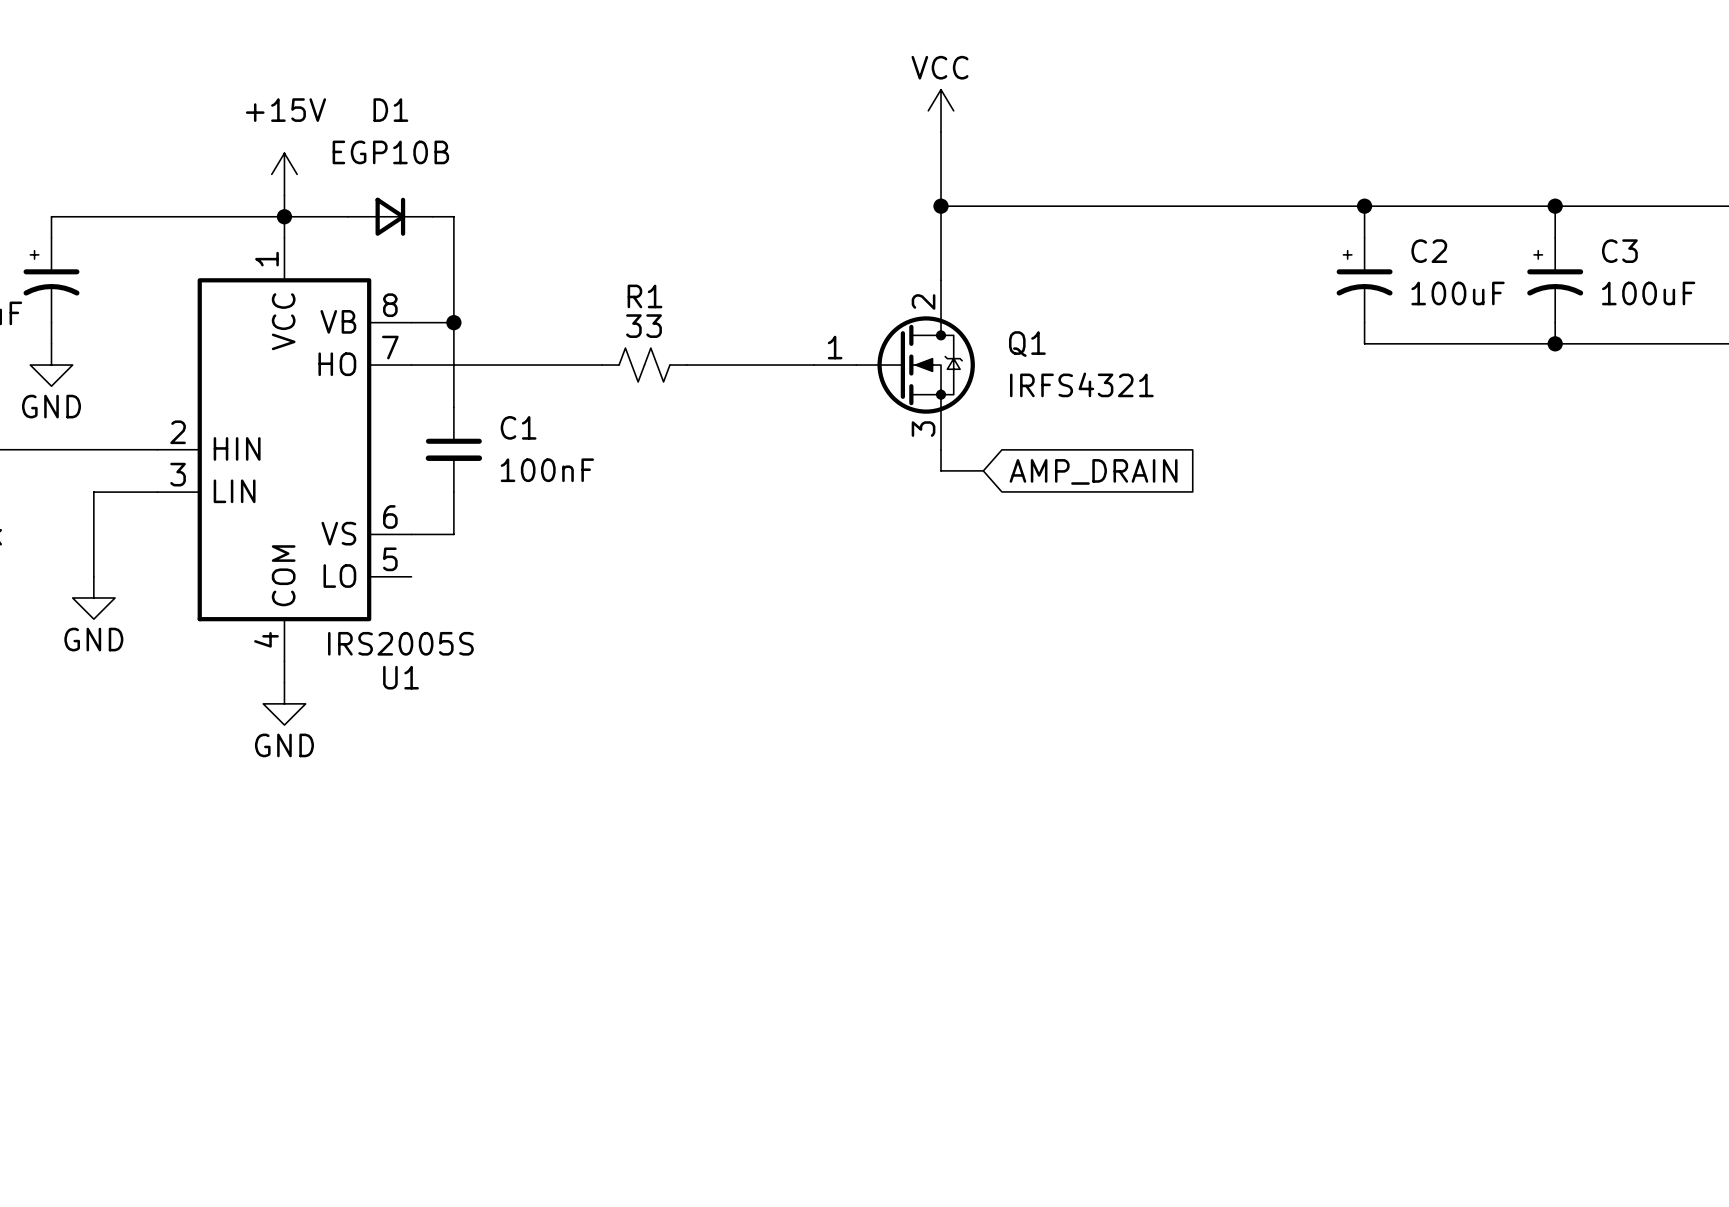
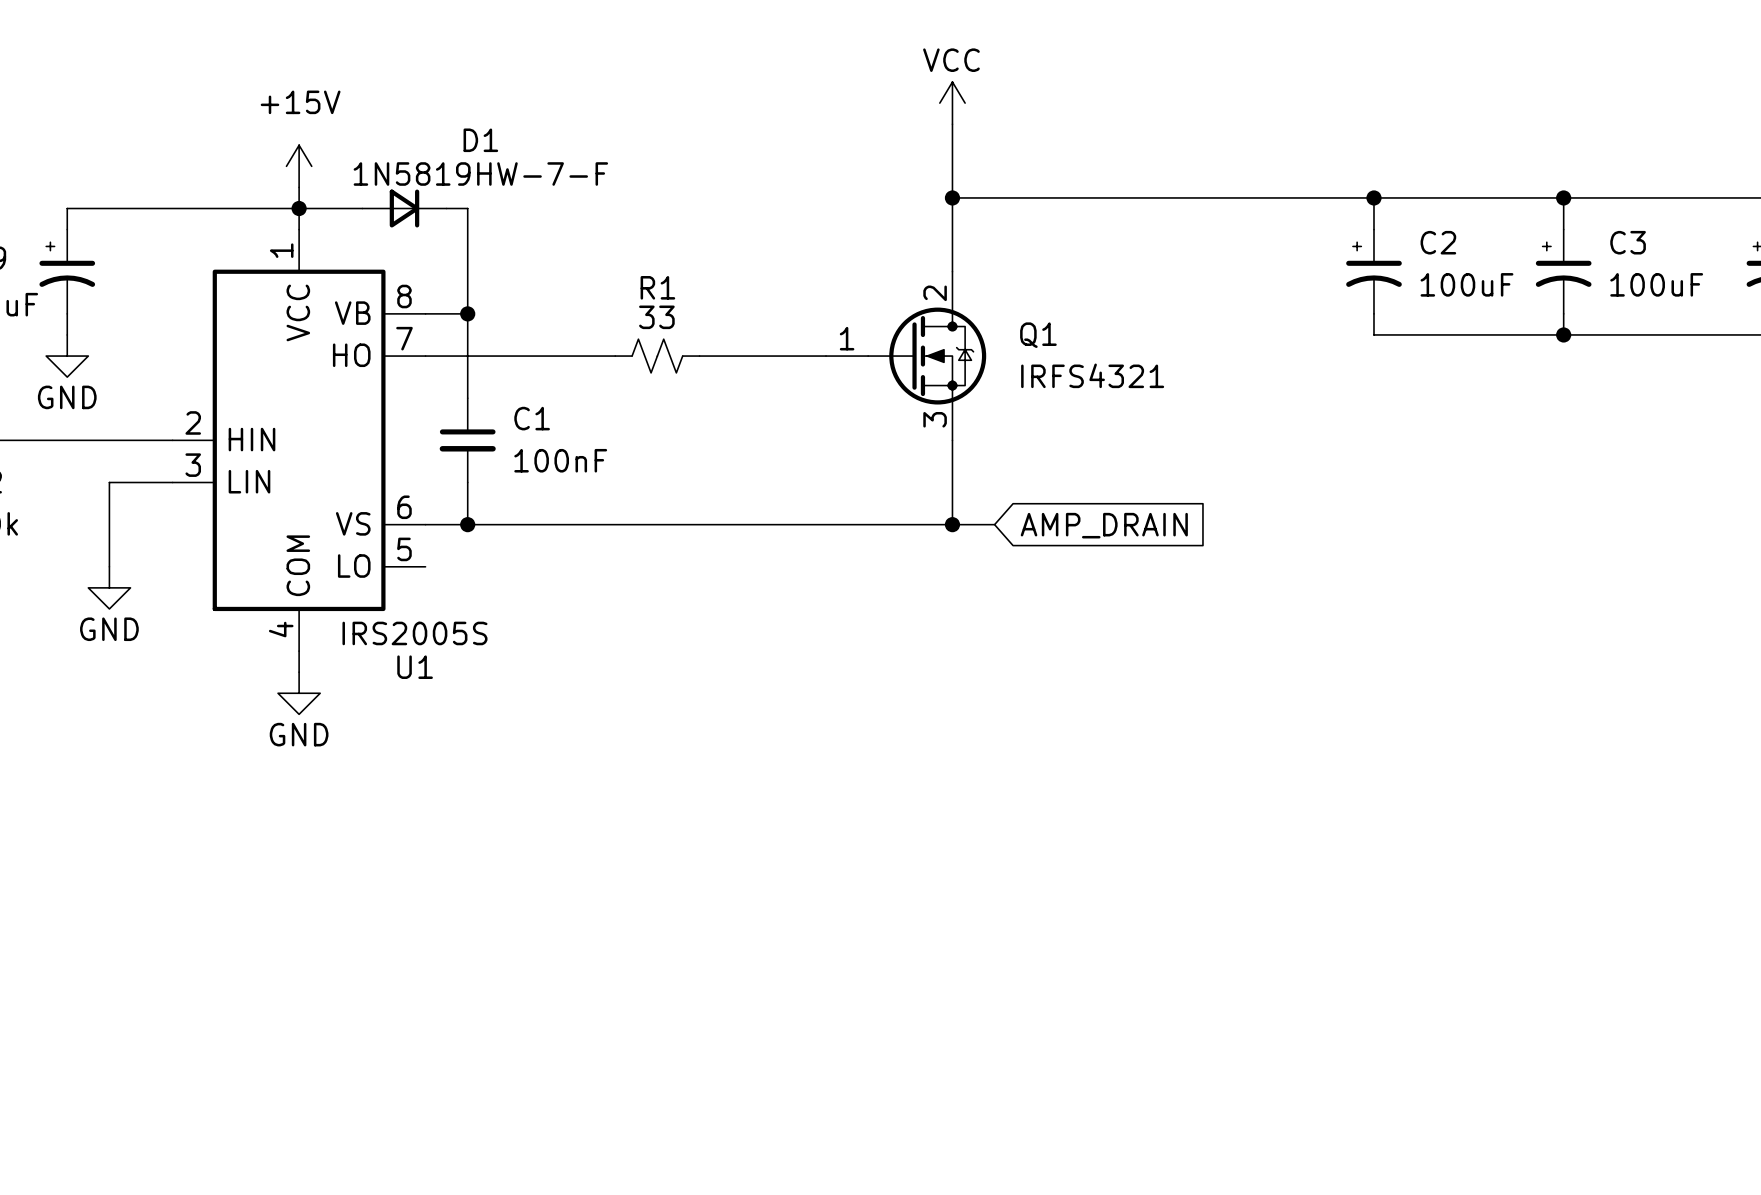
D1 name position: D1 (390, 110) -> D1 (480, 140)
D1 value: EGP10B (390, 152) -> 1N5819HW-7-F (480, 174)
wire: (941, 470) (983, 470) -> (952, 461) (952, 524)
global label position: AMP_DRAIN (1093, 471) -> AMP_DRAIN (1104, 525)
wire: none -> (467, 524) (994, 524)
junction: none -> (467, 524)
junction: none -> (952, 524)

